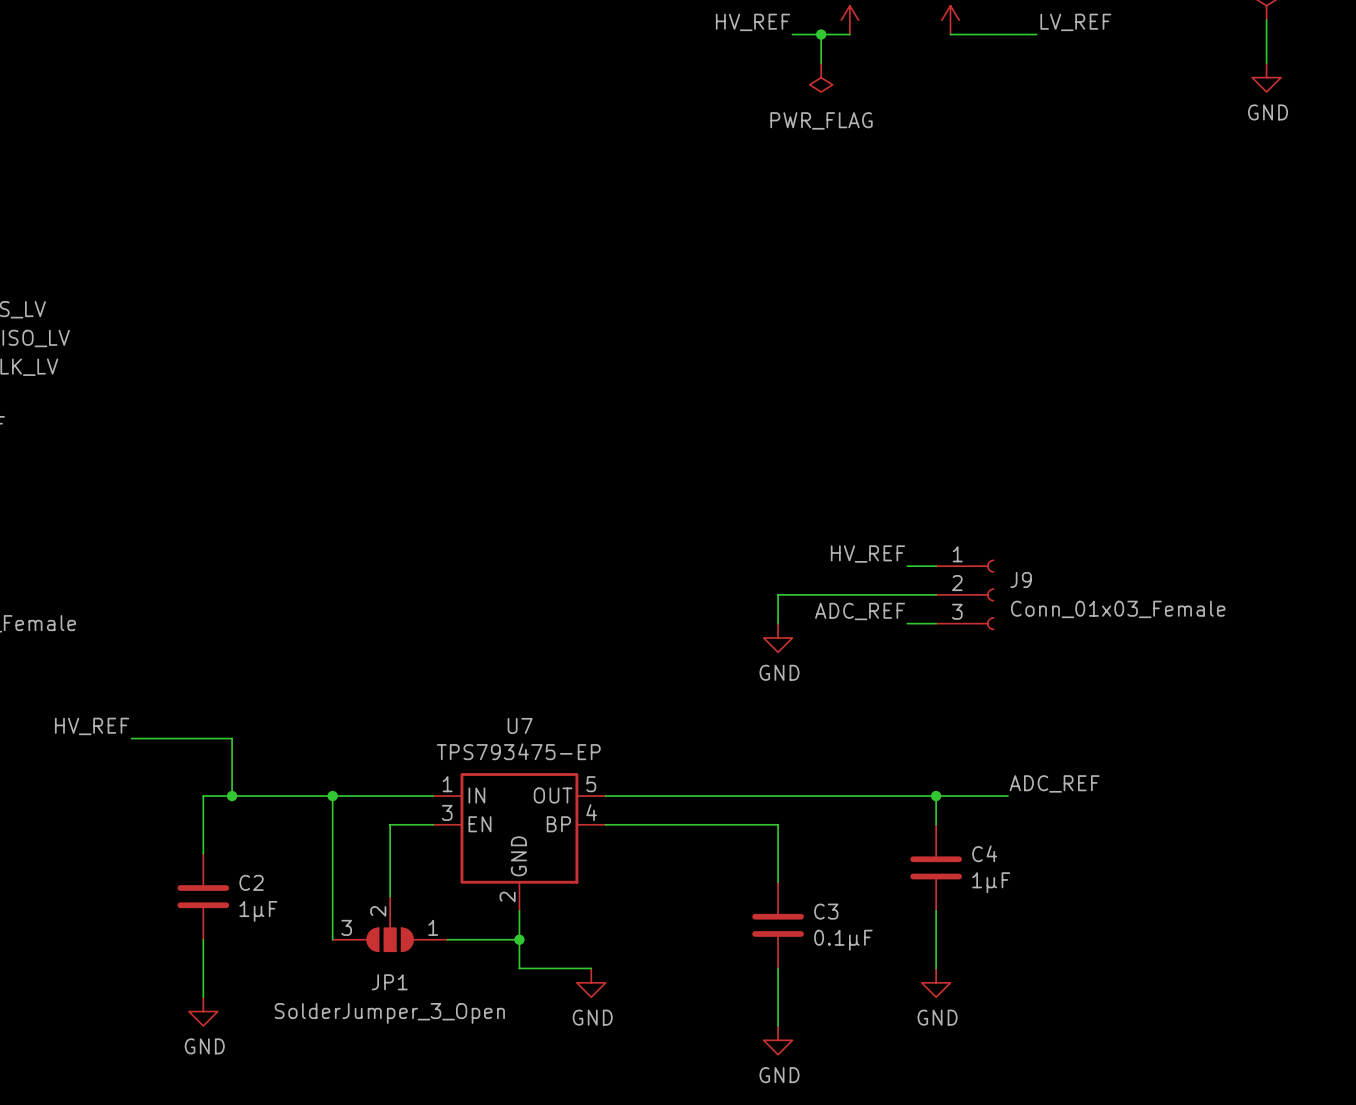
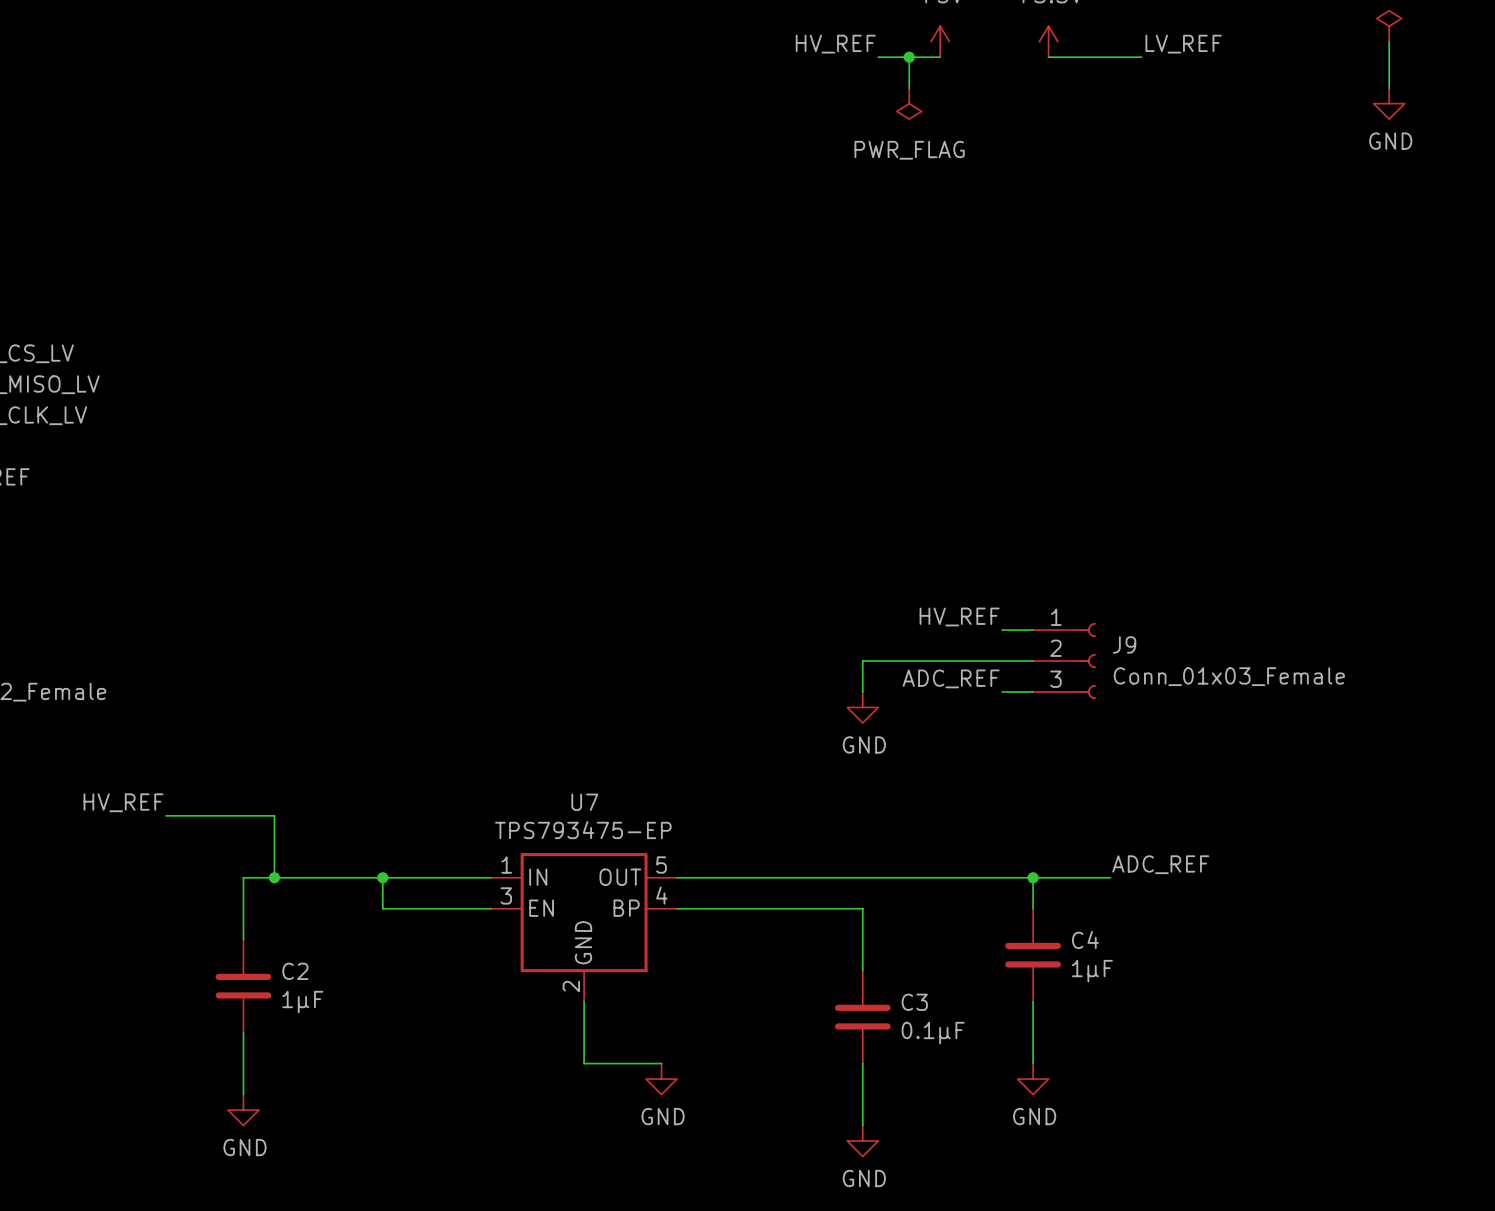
wire: (332, 824) (332, 939) -> none
wire: (390, 824) (390, 896) -> (444, 908) (382, 908)
JP1: SolderJumper_3_Open (390, 923) -> none
wire: (447, 939) (519, 939) -> none
junction: (519, 939) -> none

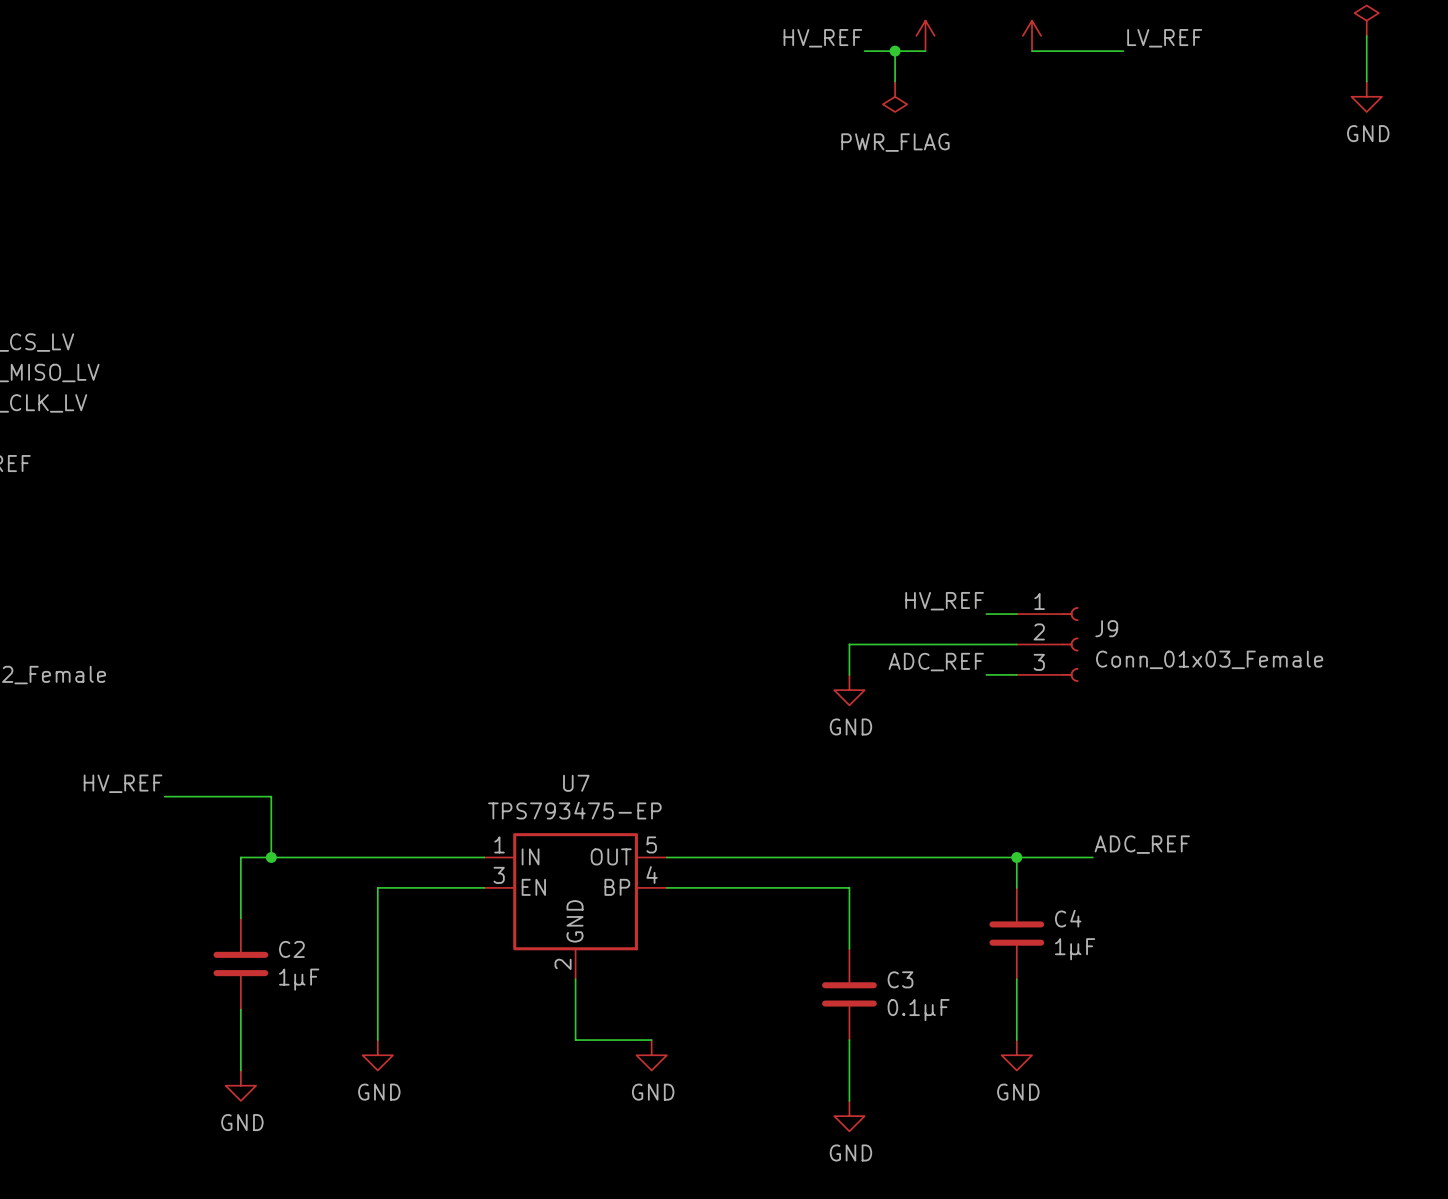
wire: (382, 877) (382, 908) -> (377, 1040) (377, 887)
junction: (382, 877) -> none
power symbol: none -> GND (377, 1055)

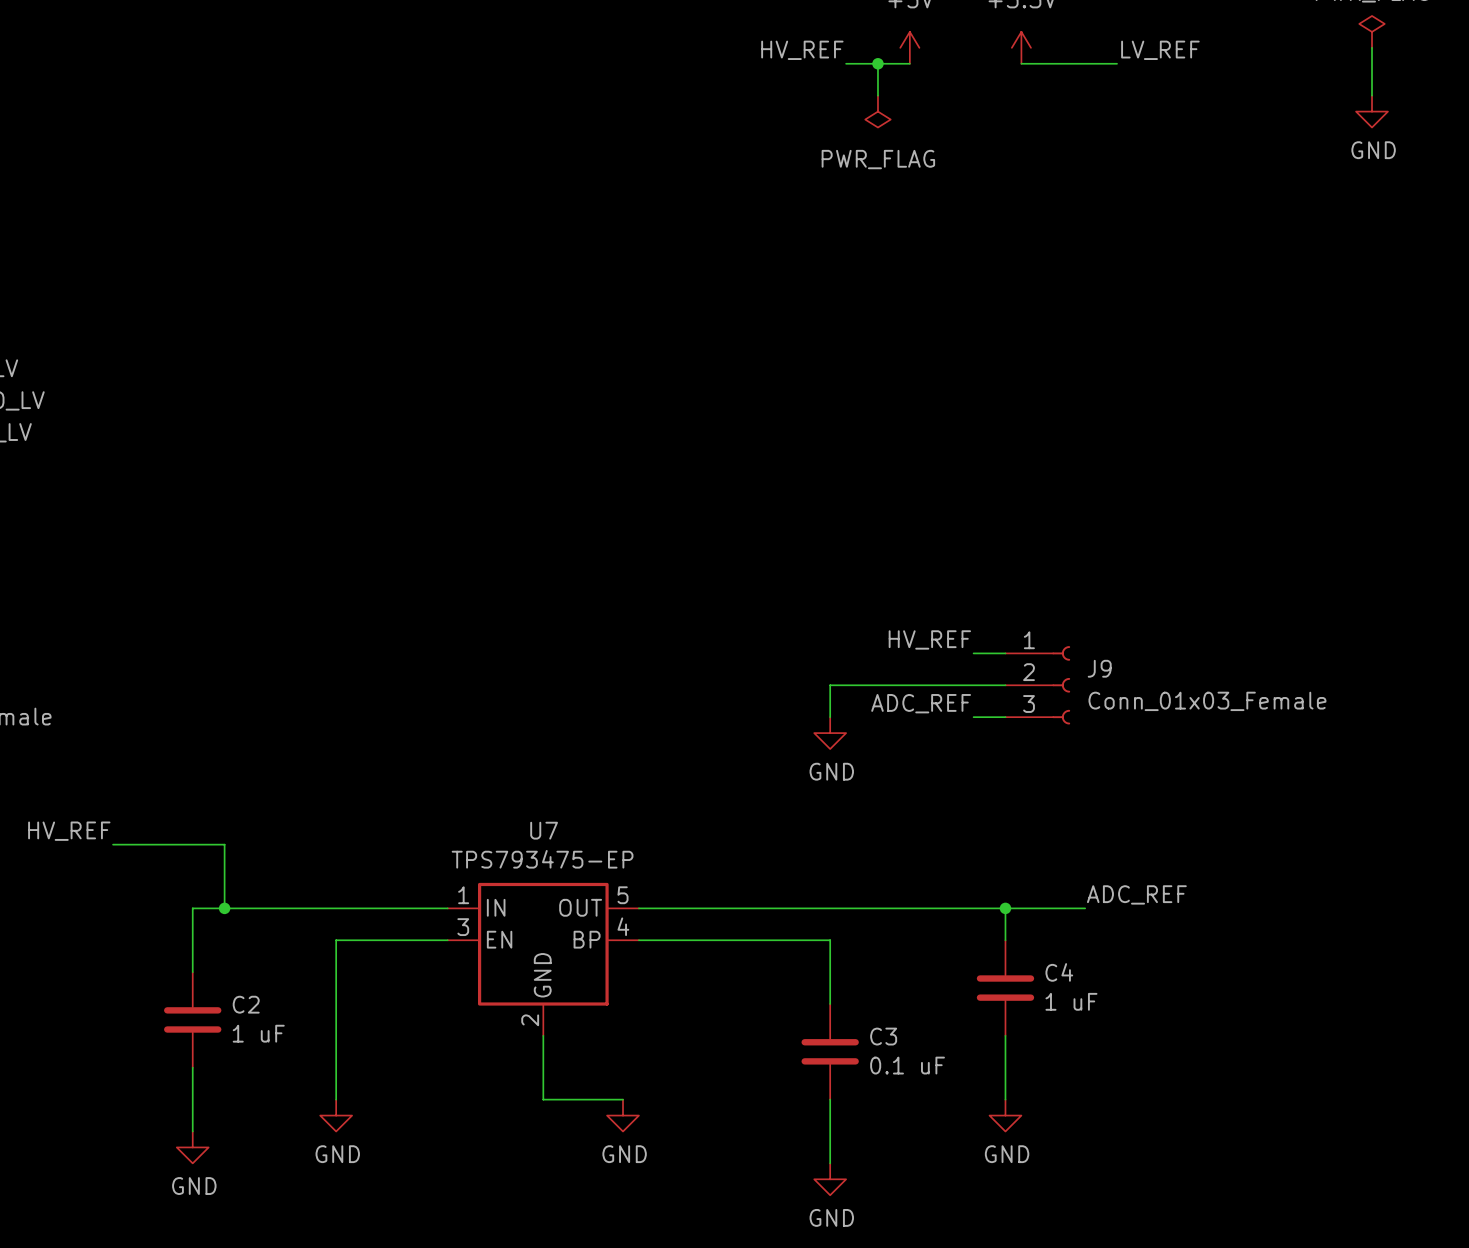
C4 value: 1μF (1075, 949) -> 1 uF (1071, 1001)
C2 value: 1μF (299, 979) -> 1 uF (258, 1033)
C3 value: 0.1μF (918, 1010) -> 0.1 uF (907, 1065)

